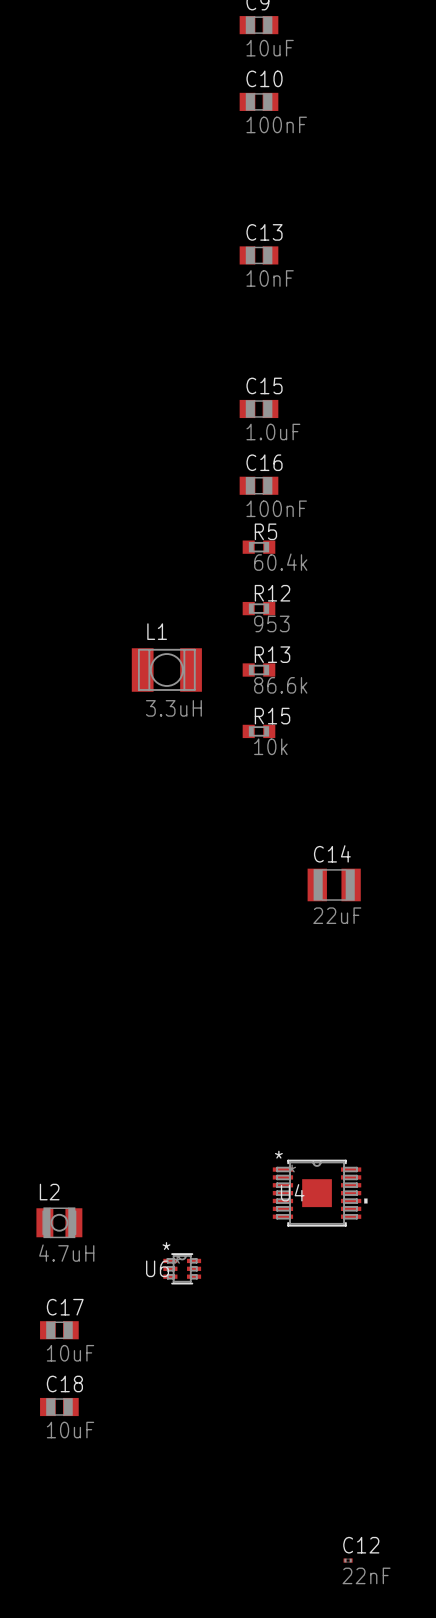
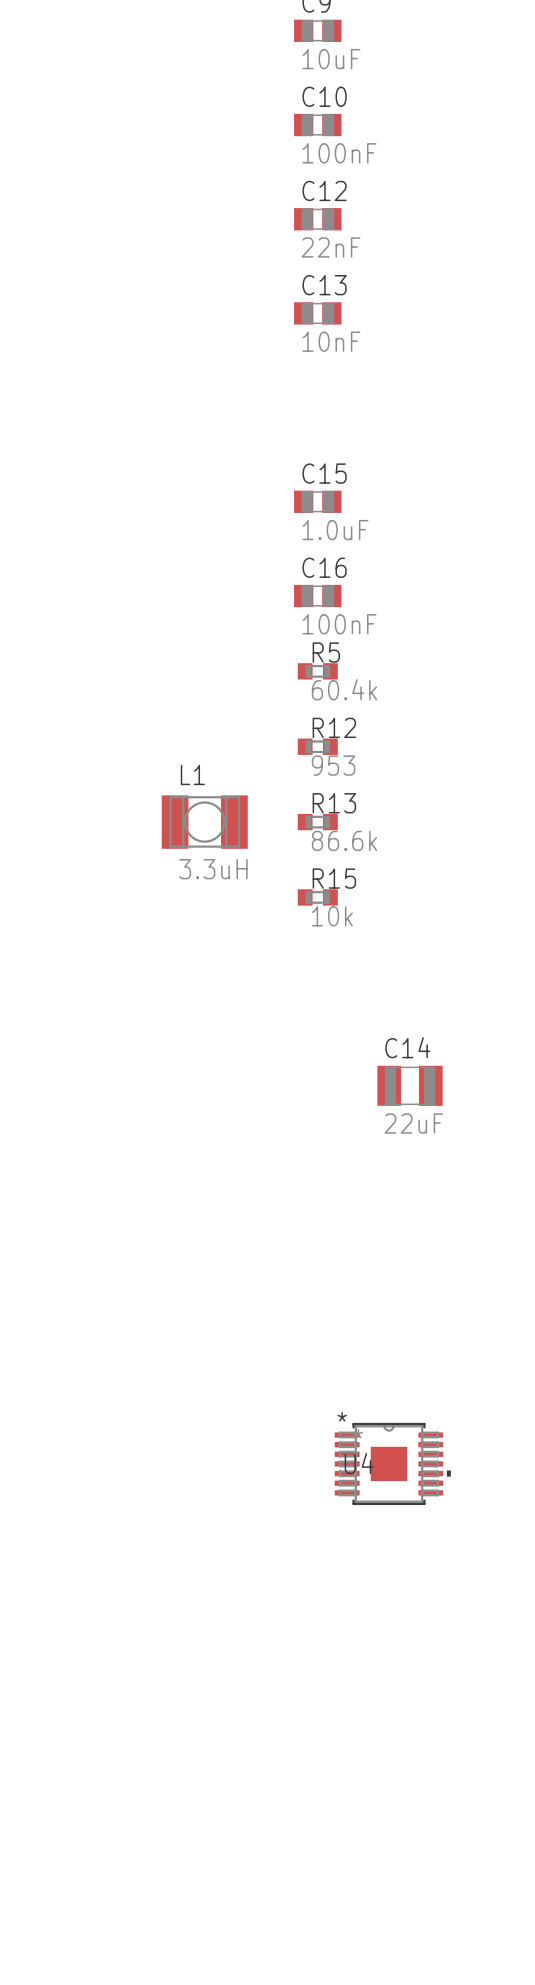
L2: 4.7uH (59, 1222) -> none
U6: (182, 1268) -> none
C17: 10uF (59, 1330) -> none
C18: 10uF (59, 1407) -> none
C12 footprint: [343, 1558, 353, 1563] -> [294, 208, 342, 231]

